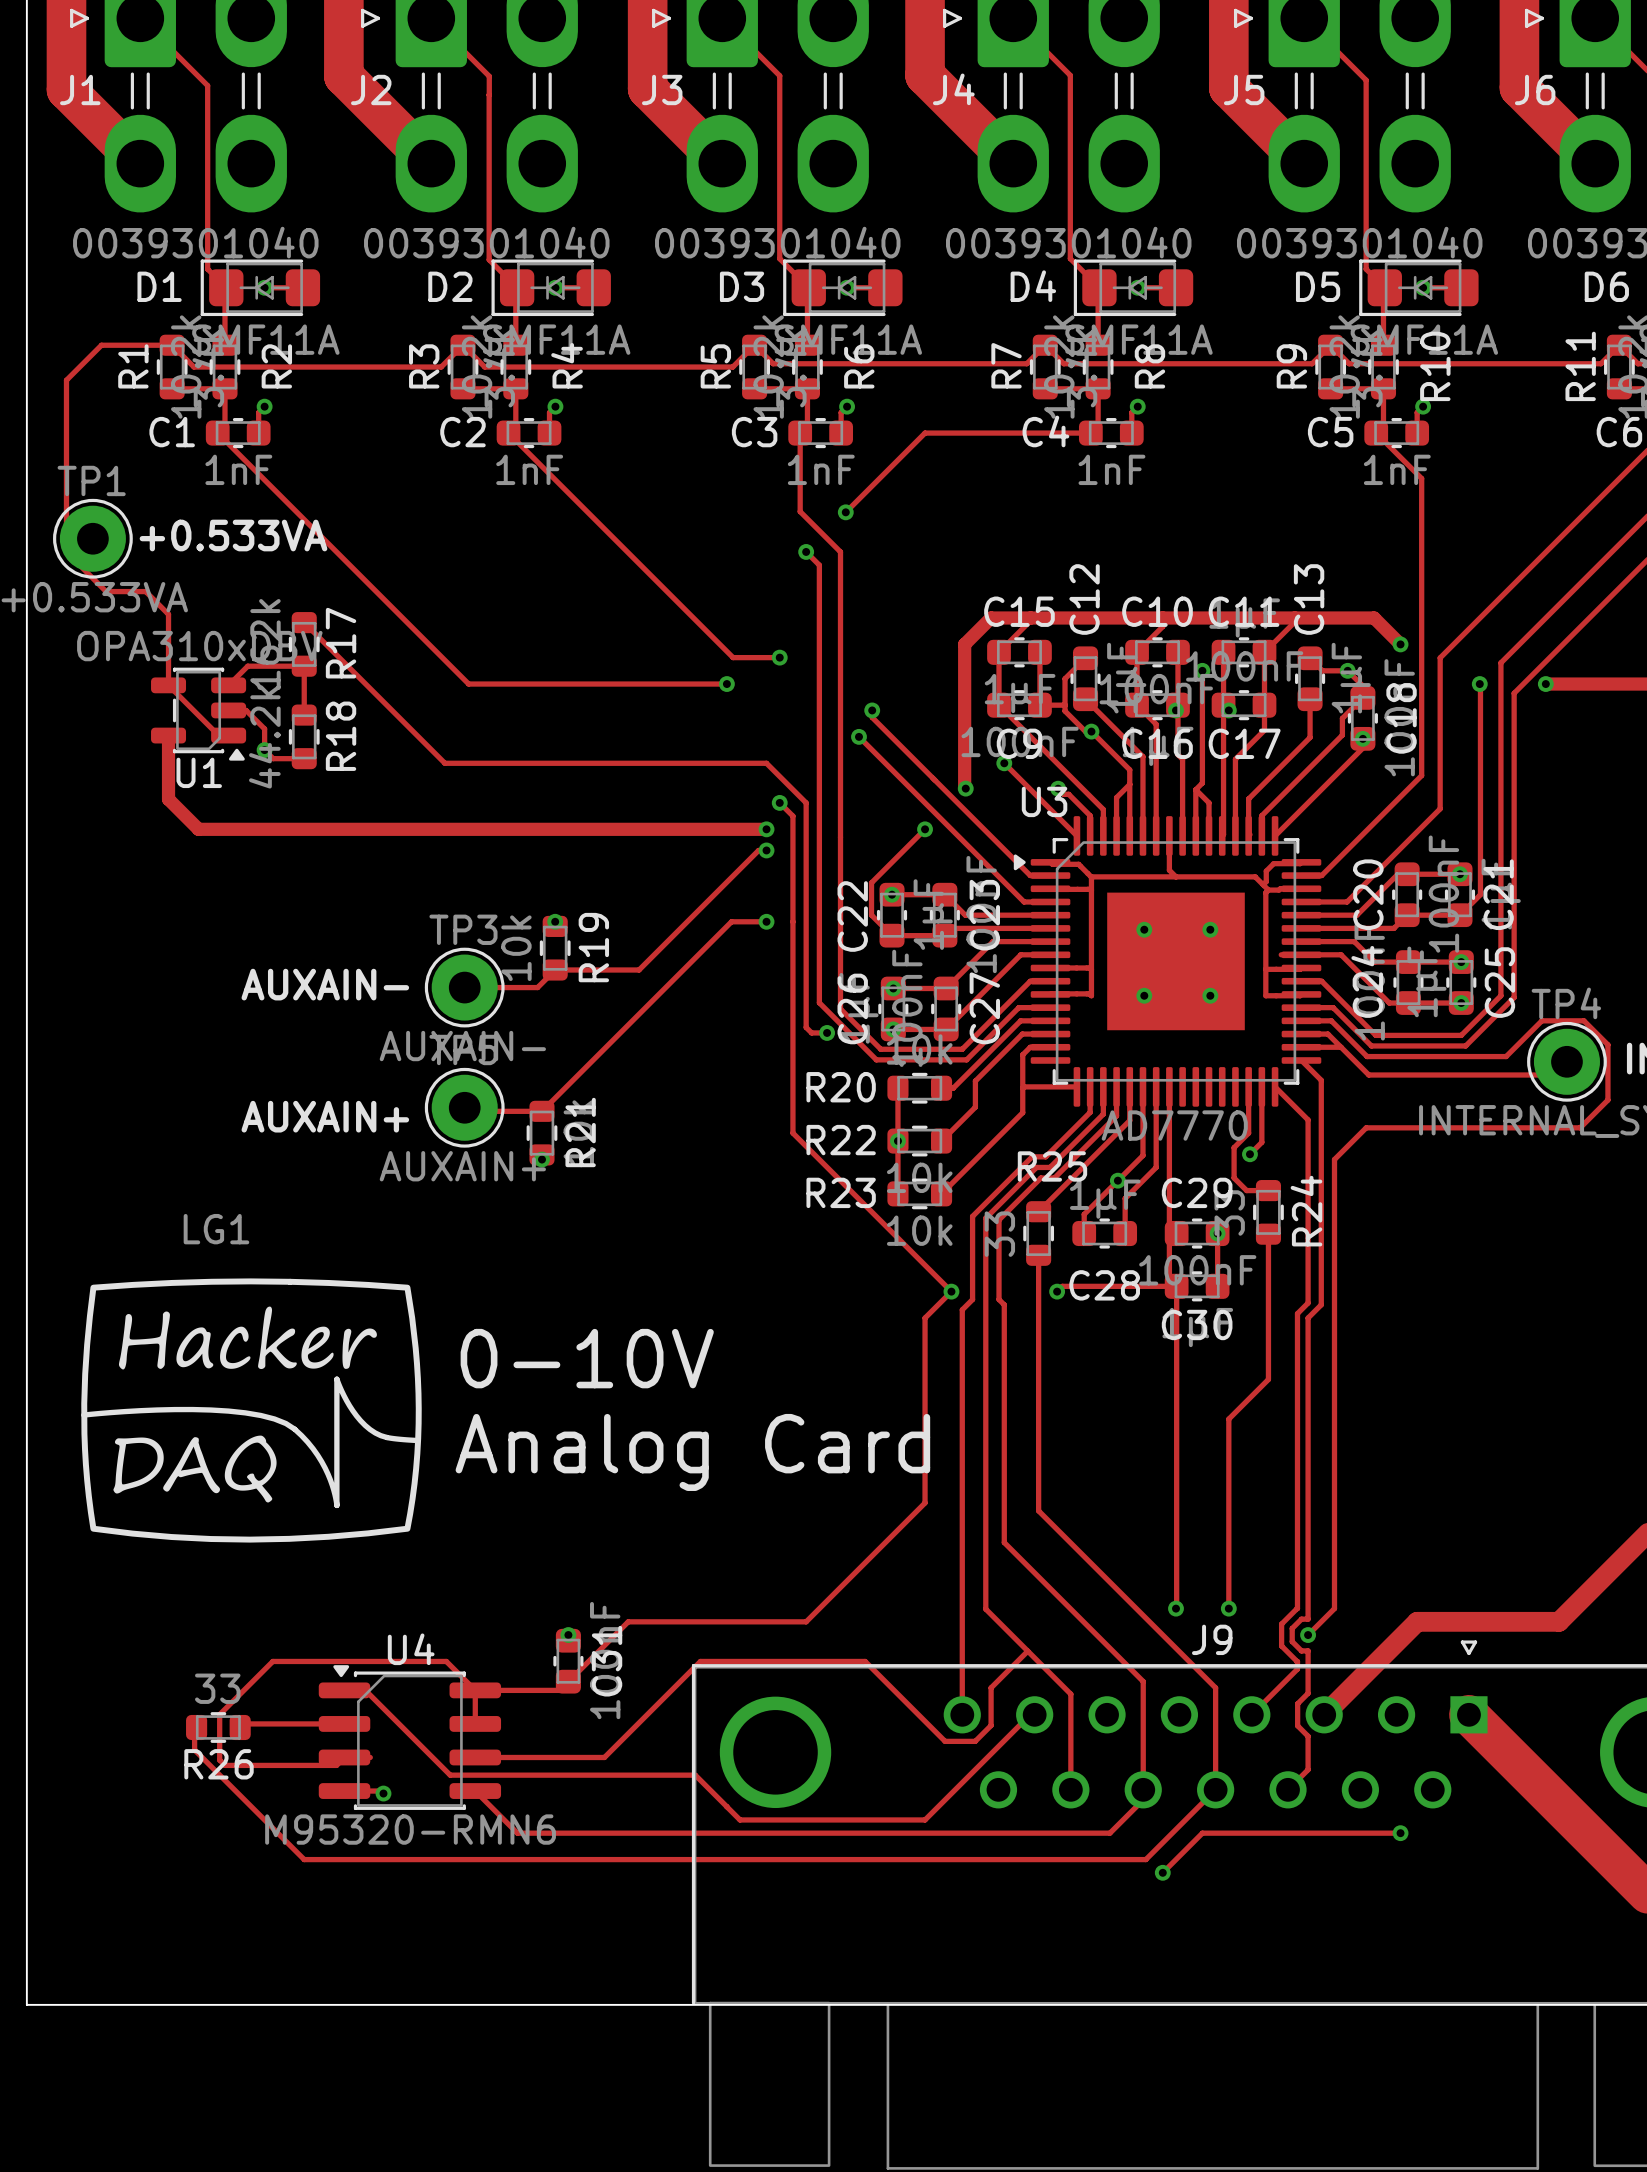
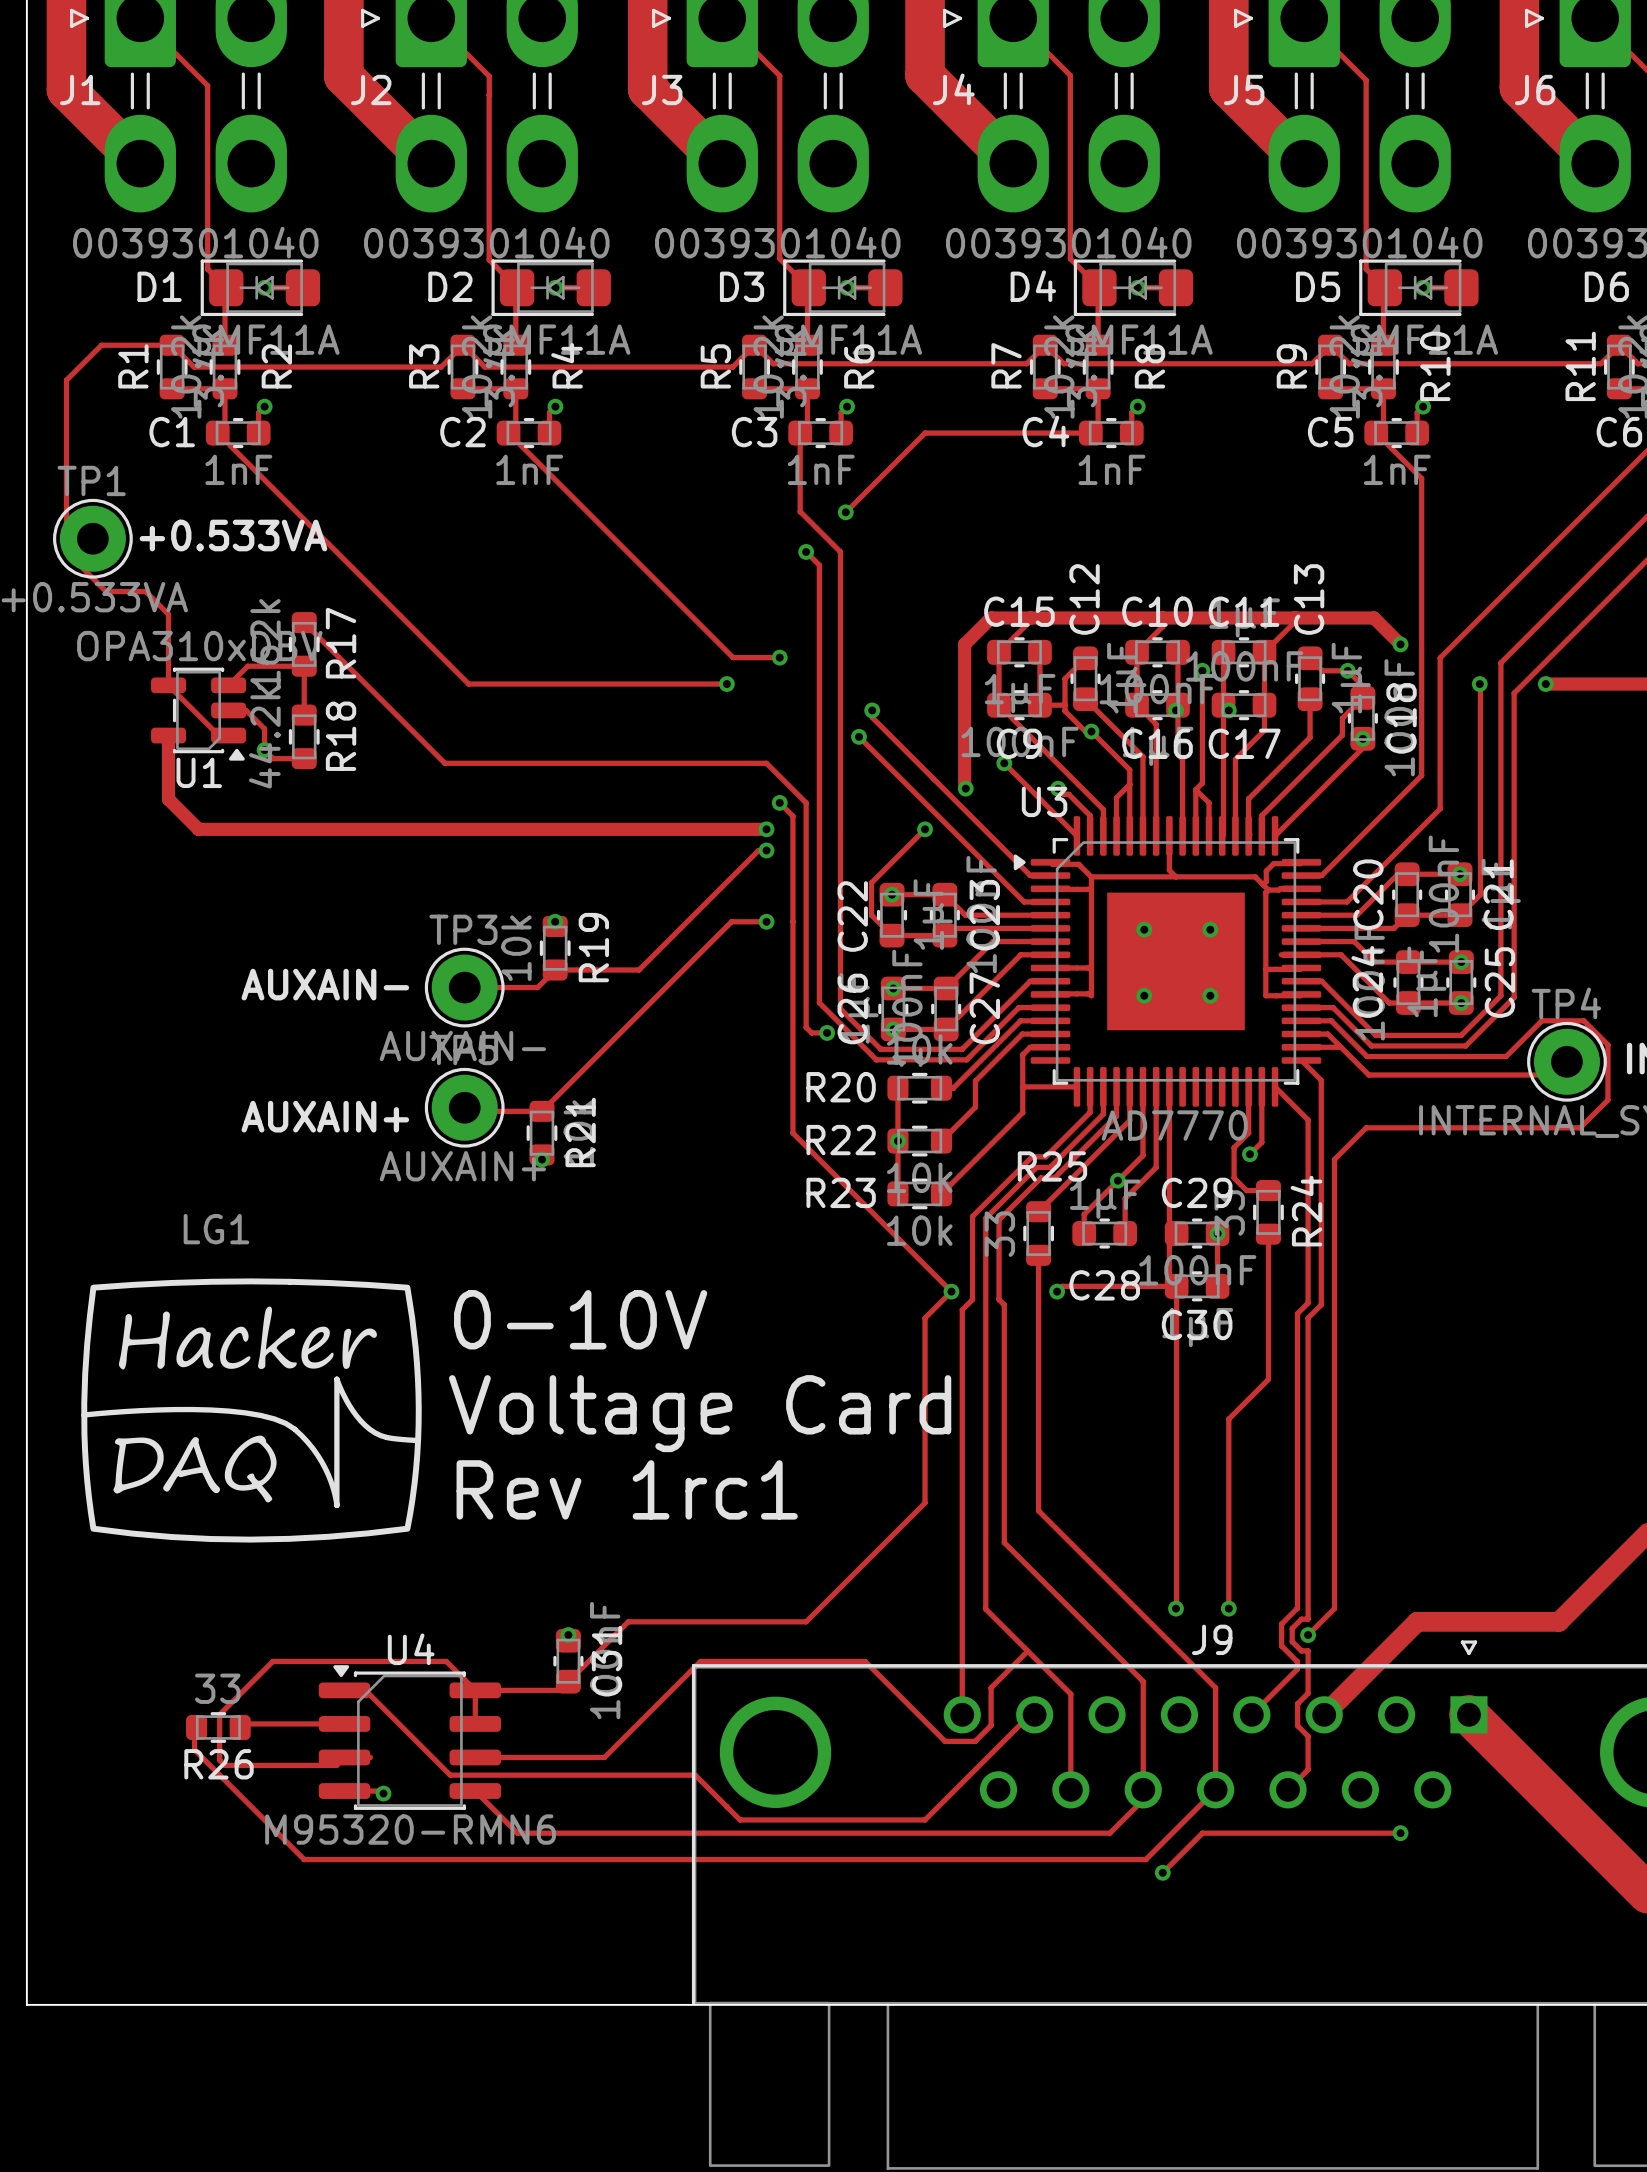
text position: 0-10V (587, 1358) -> 0-10V (580, 1319)
text: Analog Card (692, 1452) -> Voltage Card (700, 1413)
text: none -> Rev 1rc1 (627, 1489)

